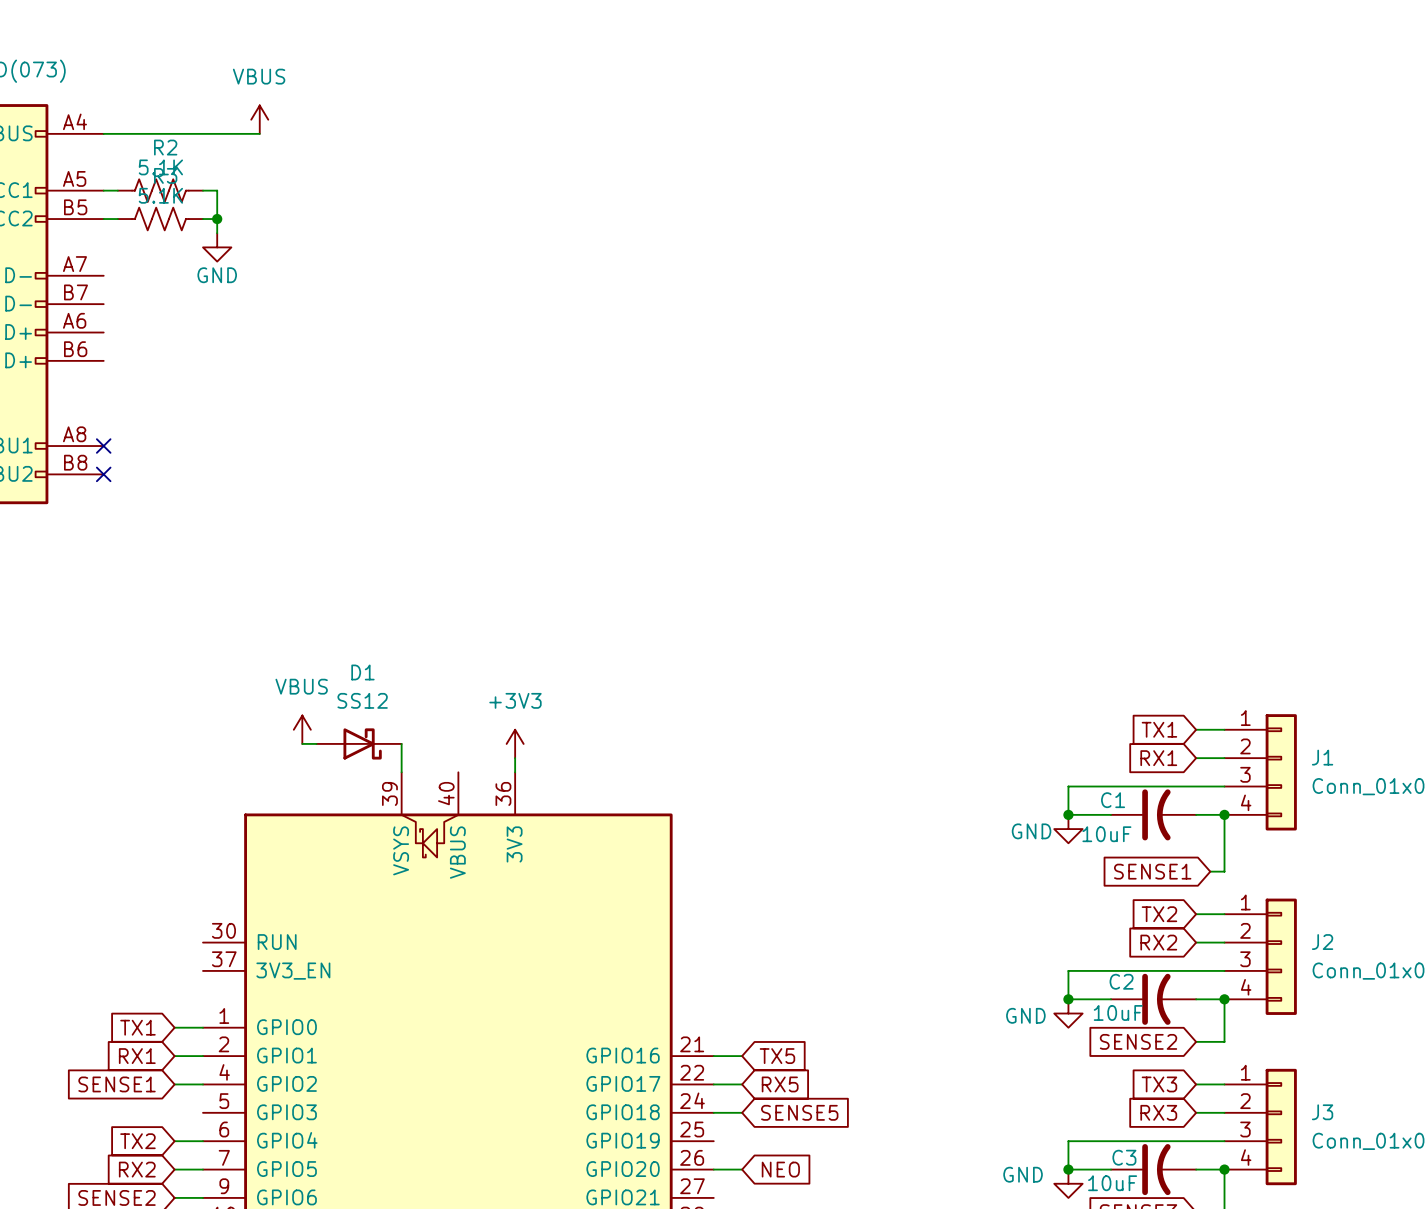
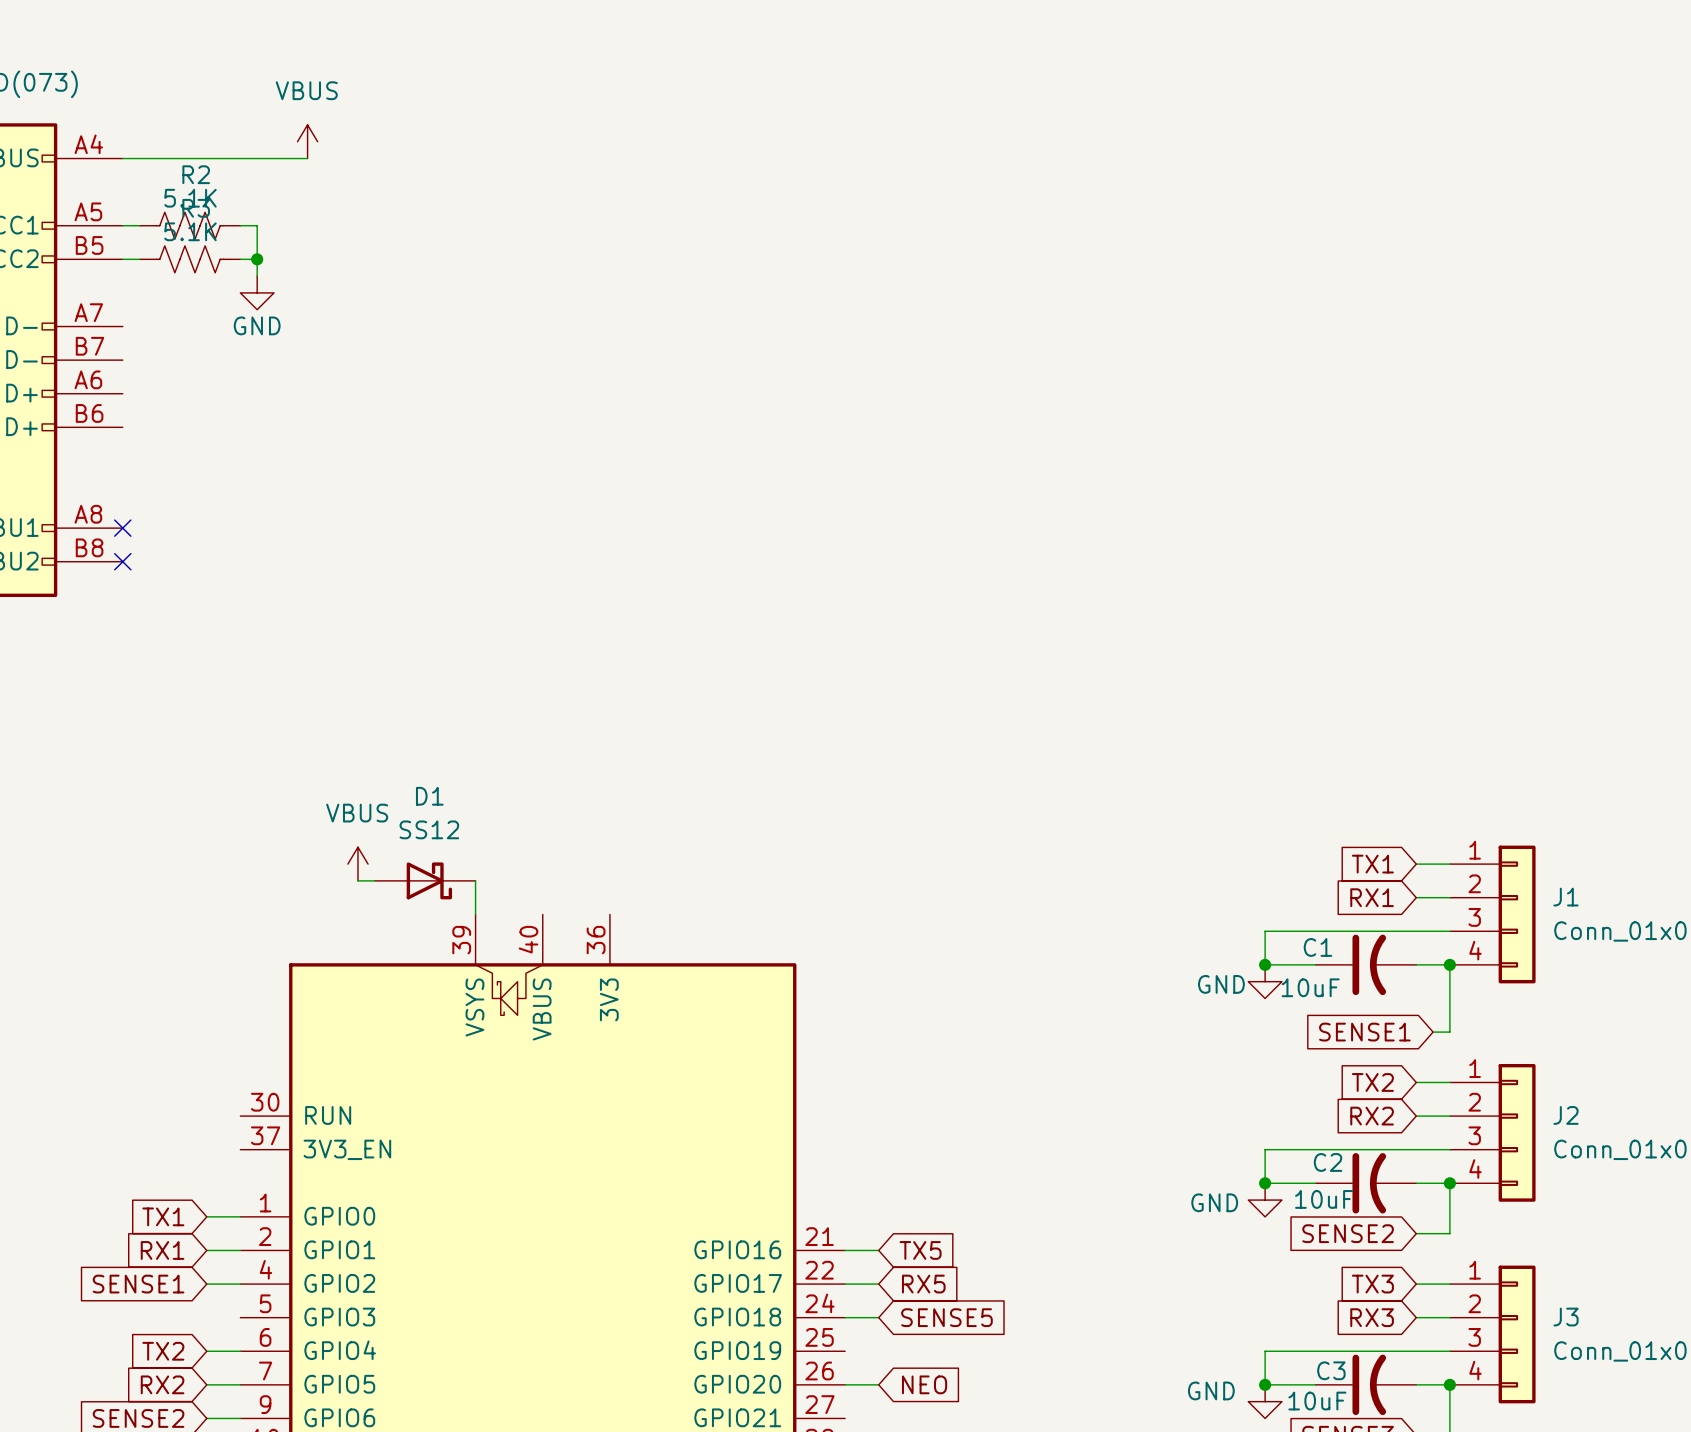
power symbol: +3V3 (515, 743) -> none
wire: (515, 758) (515, 772) -> none

